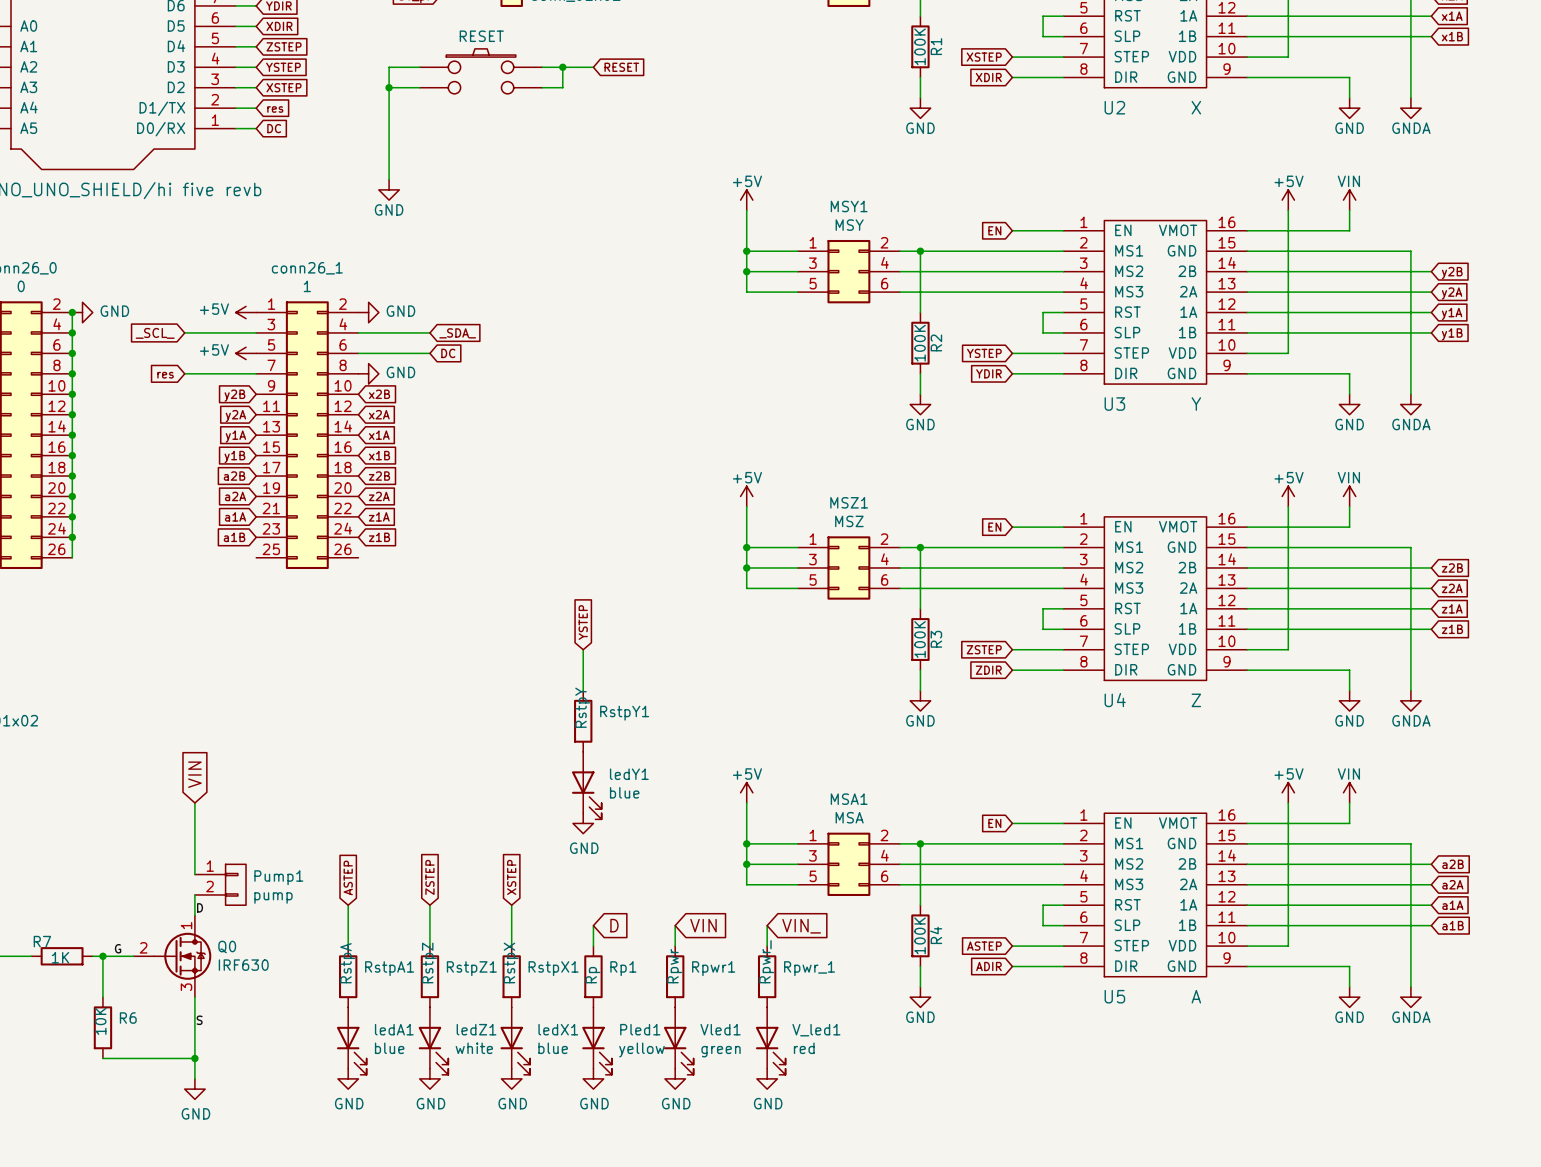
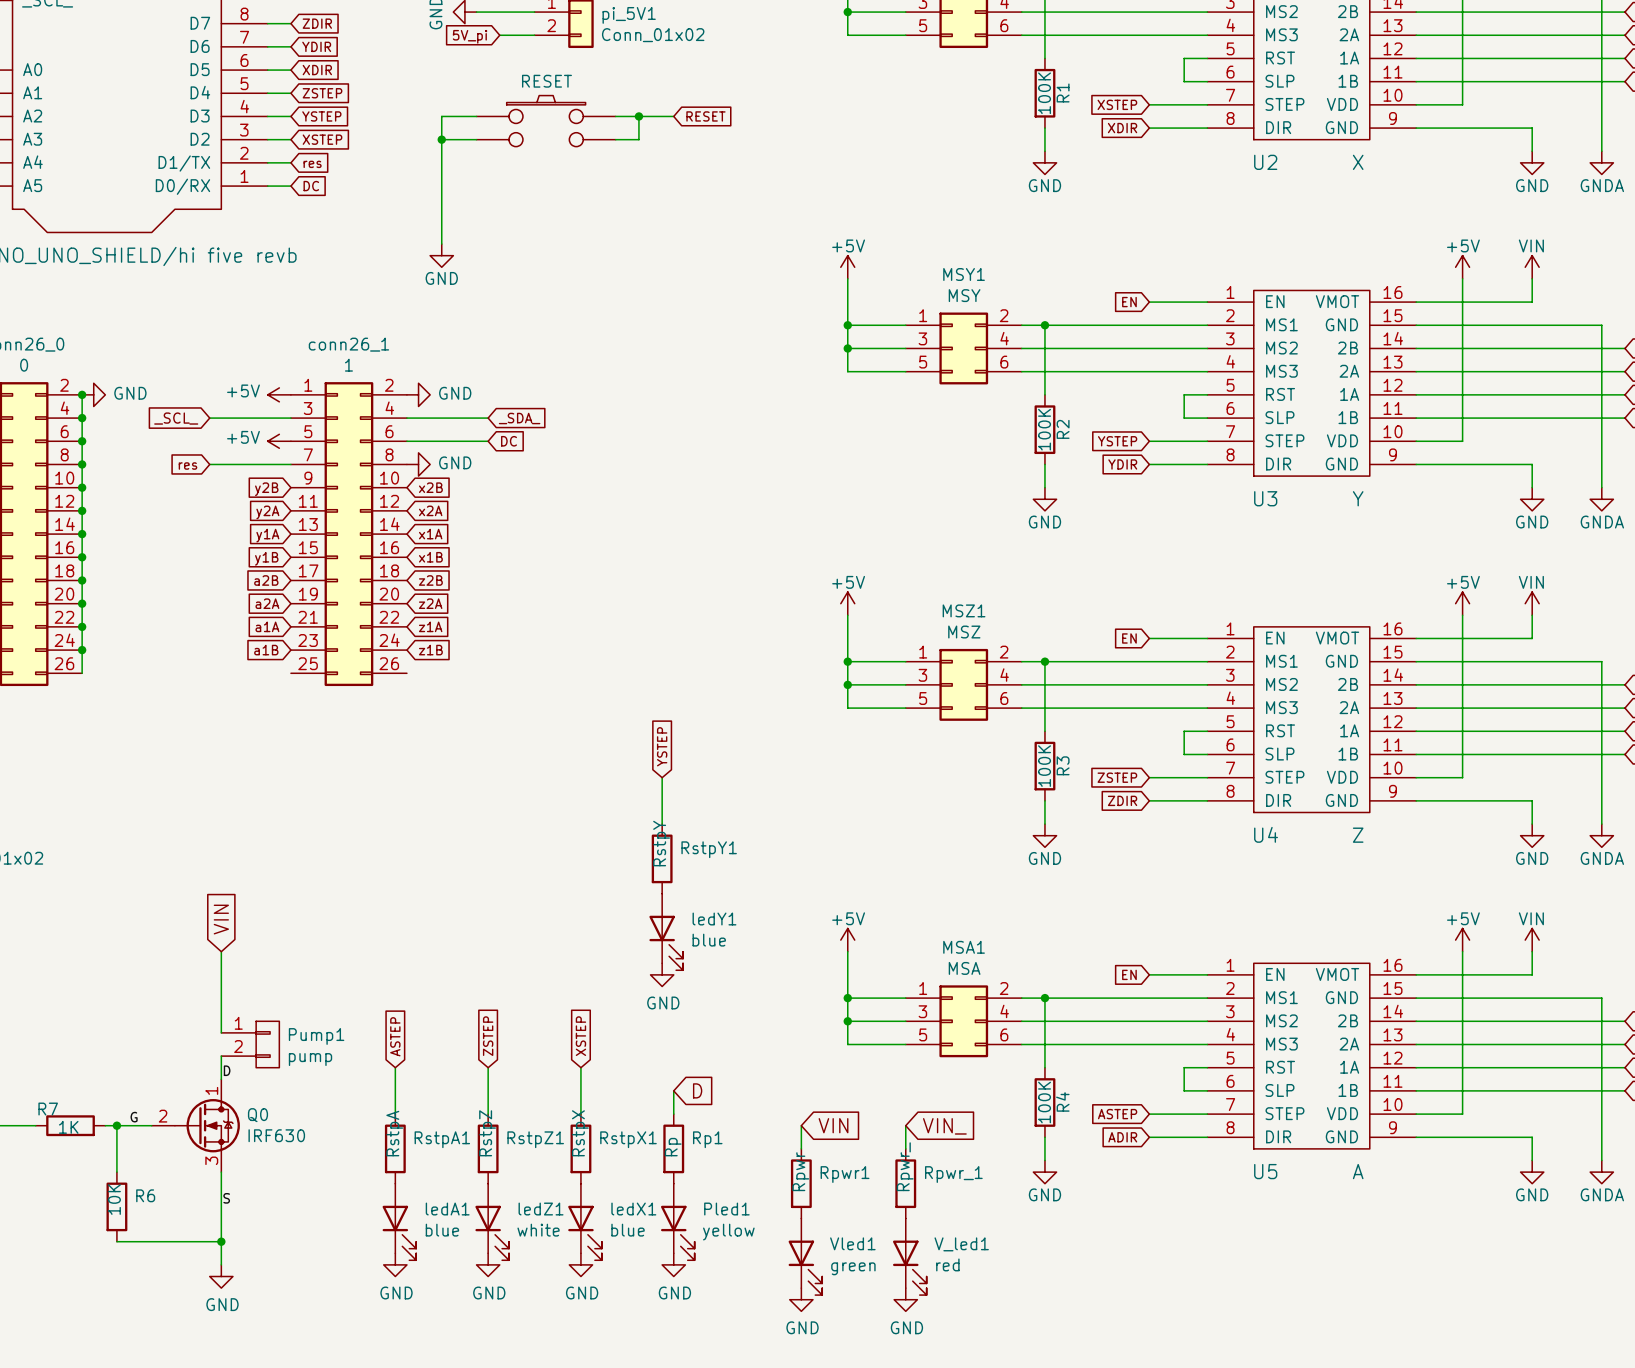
wire: (675, 925) (675, 946) -> (801, 1125) (801, 1148)
global label position: VIN (703, 925) -> VIN (833, 1125)
wire: (767, 925) (767, 946) -> (905, 1125) (905, 1148)
global label position: VIN_ (801, 926) -> VIN_ (944, 1126)
Rpwr1 position: (675, 976) -> (801, 1183)
Rpwr_1 position: (767, 976) -> (905, 1183)
Vled1 position: (678, 1041) -> (805, 1256)
V_led1 position: (770, 1041) -> (909, 1256)
power symbol: GND (675, 1078) -> none
power symbol: GND (767, 1078) -> none
power symbol: none -> GND (801, 1299)
power symbol: none -> GND (905, 1299)

